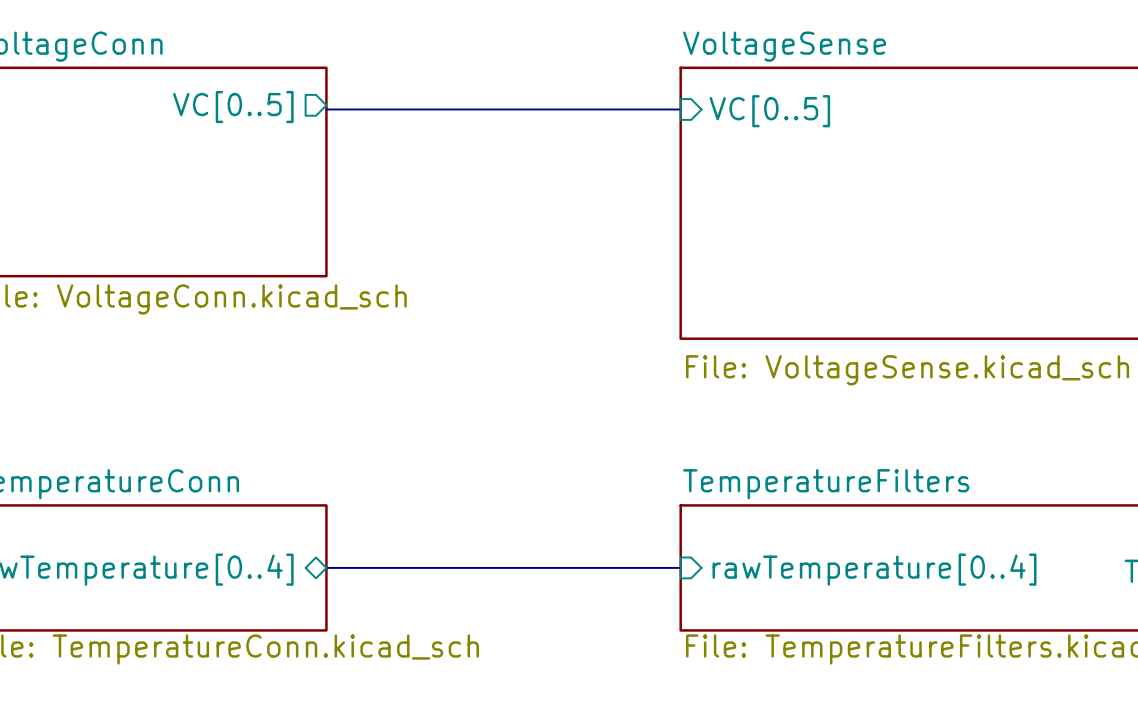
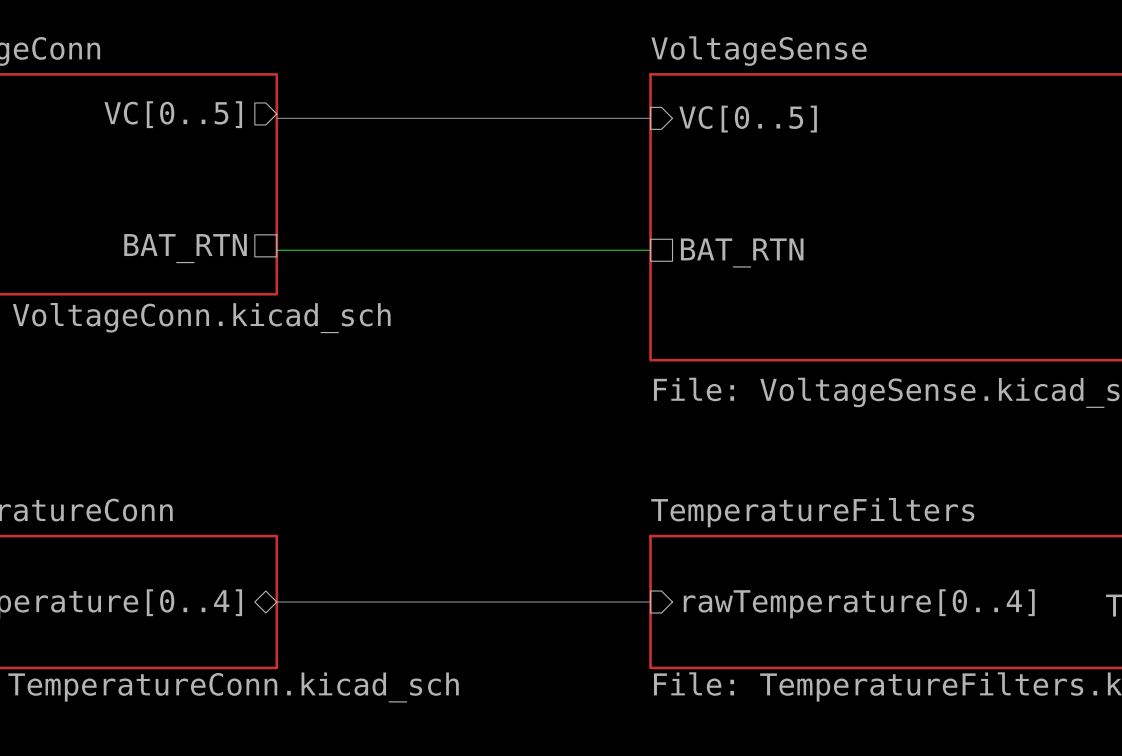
sheet pin: none -> BAT_RTN (185, 248)
wire: none -> (276, 250) (650, 250)
sheet pin: none -> BAT_RTN (742, 252)

